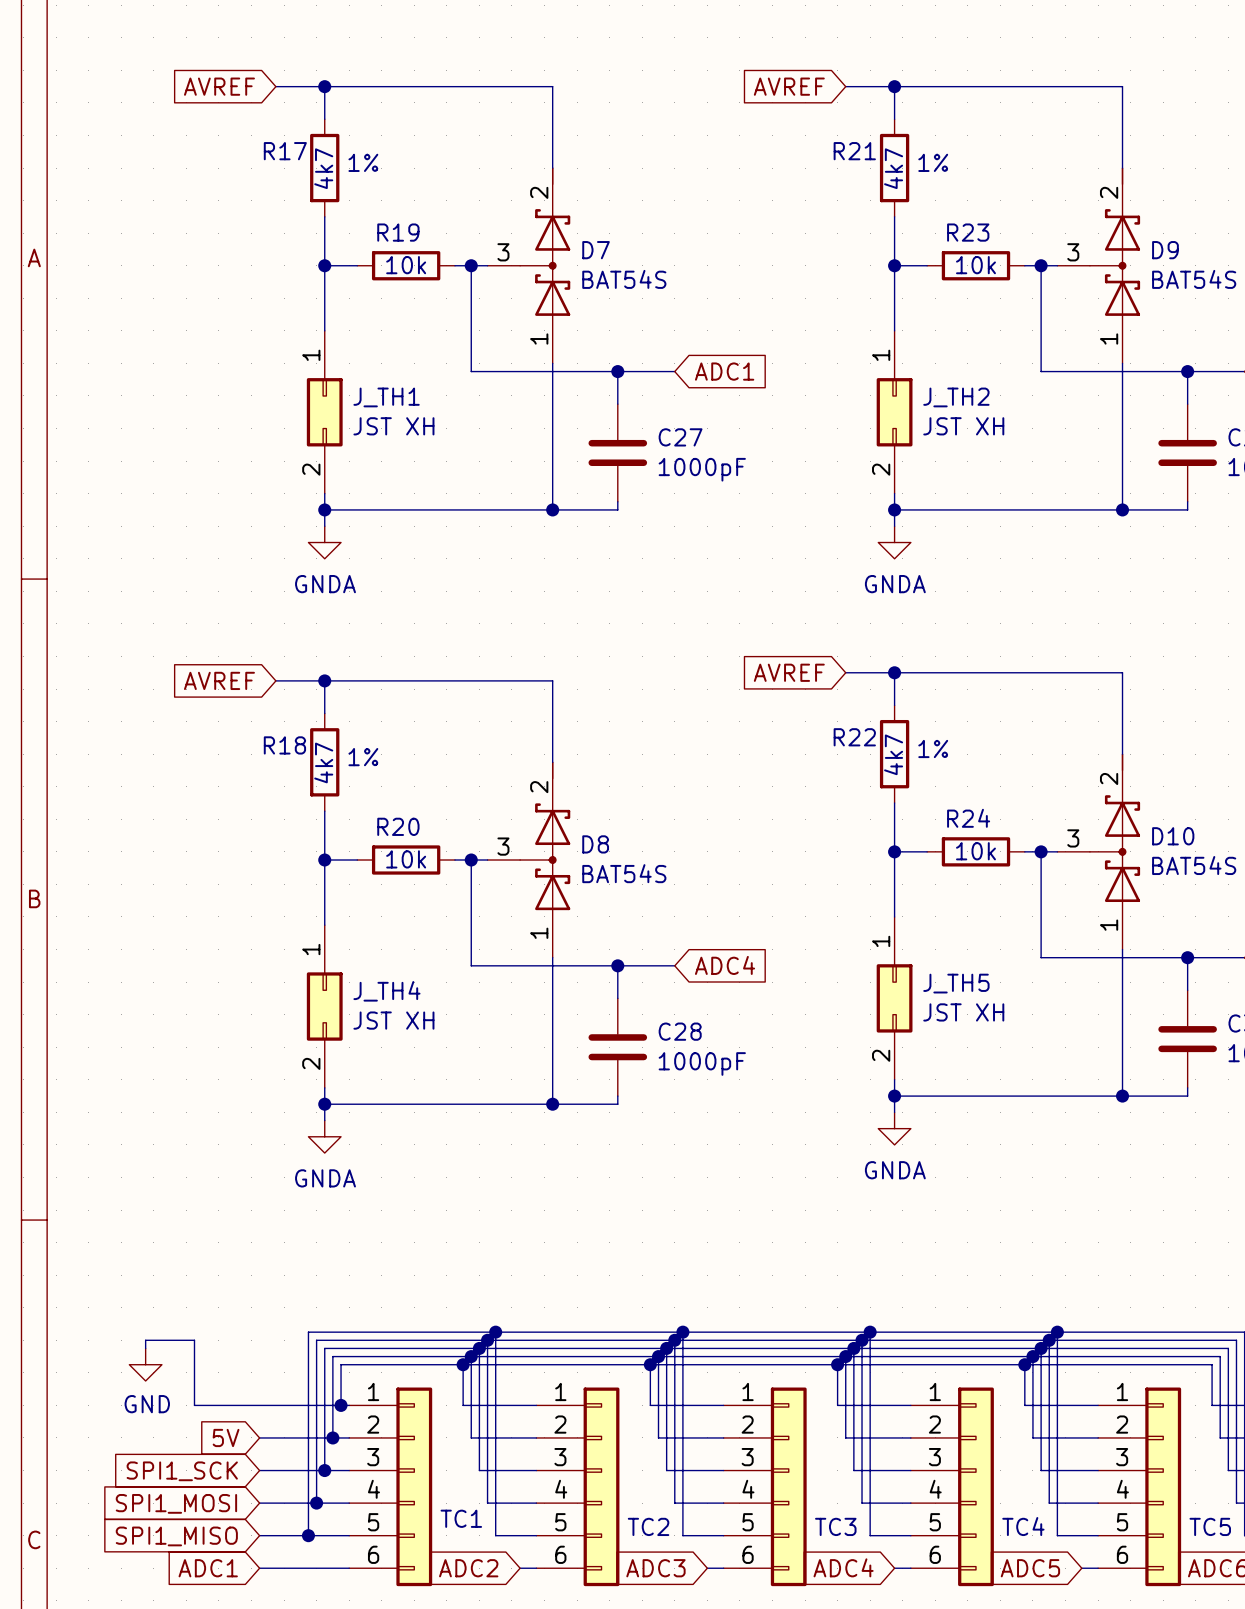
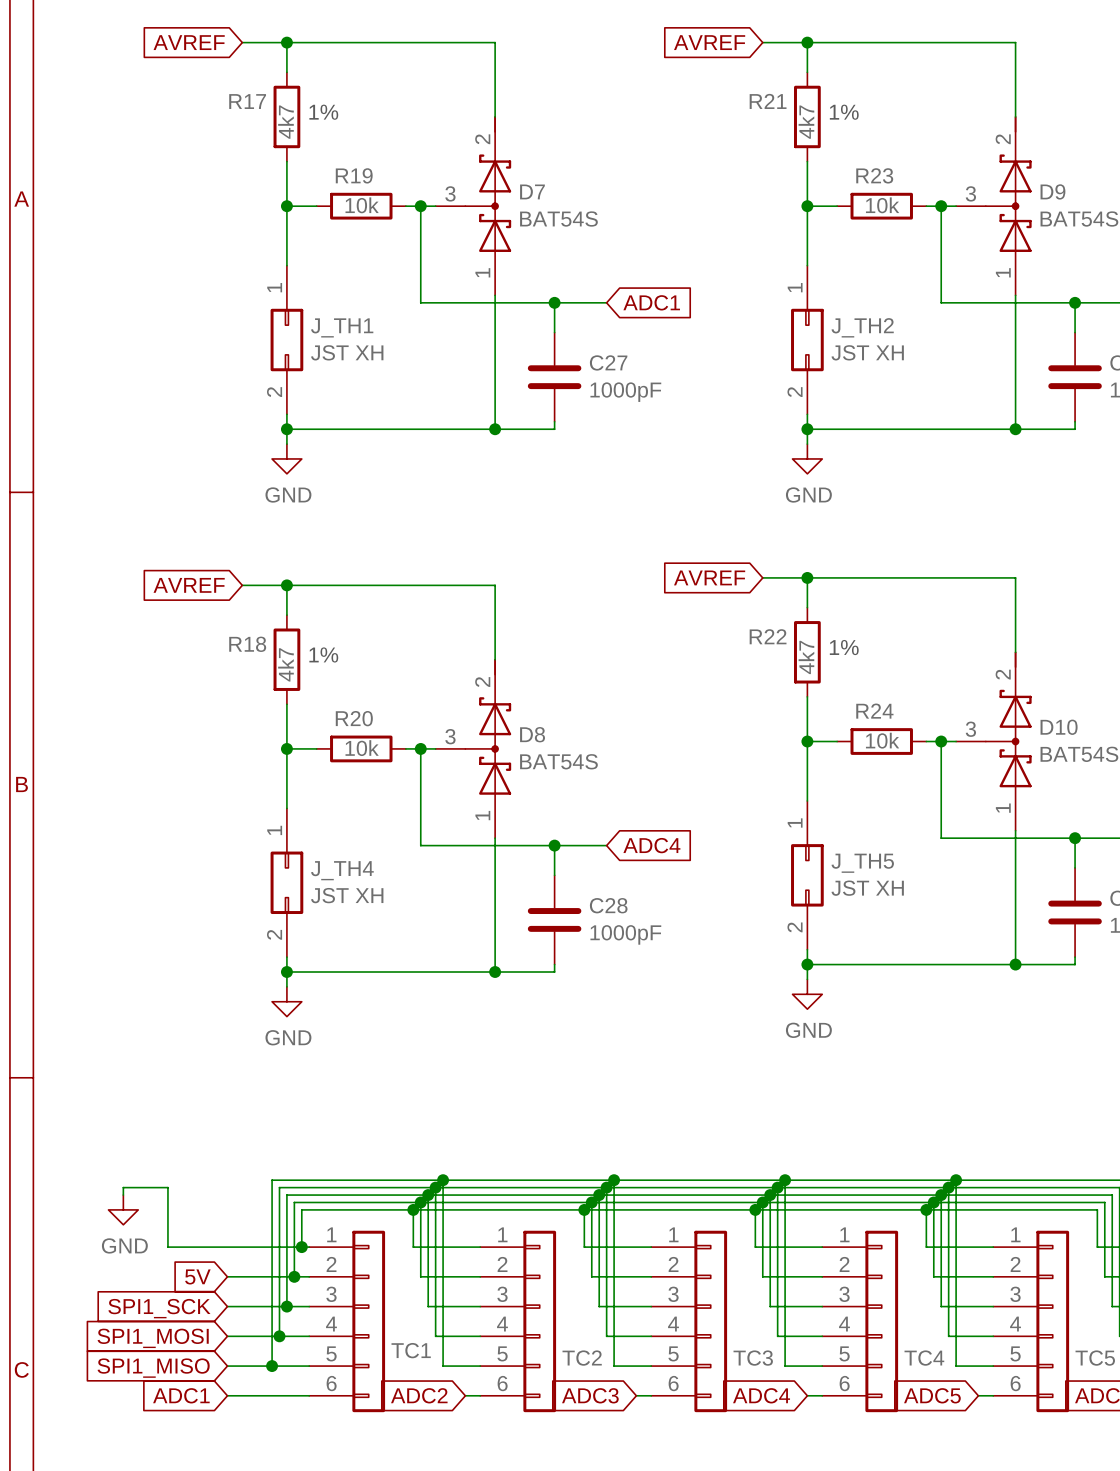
power symbol: GNDA (324, 542) -> GND (286, 458)
power symbol: GNDA (894, 542) -> GND (807, 458)
power symbol: GNDA (894, 1128) -> GND (807, 994)
power symbol: GNDA (324, 1136) -> GND (286, 1001)

